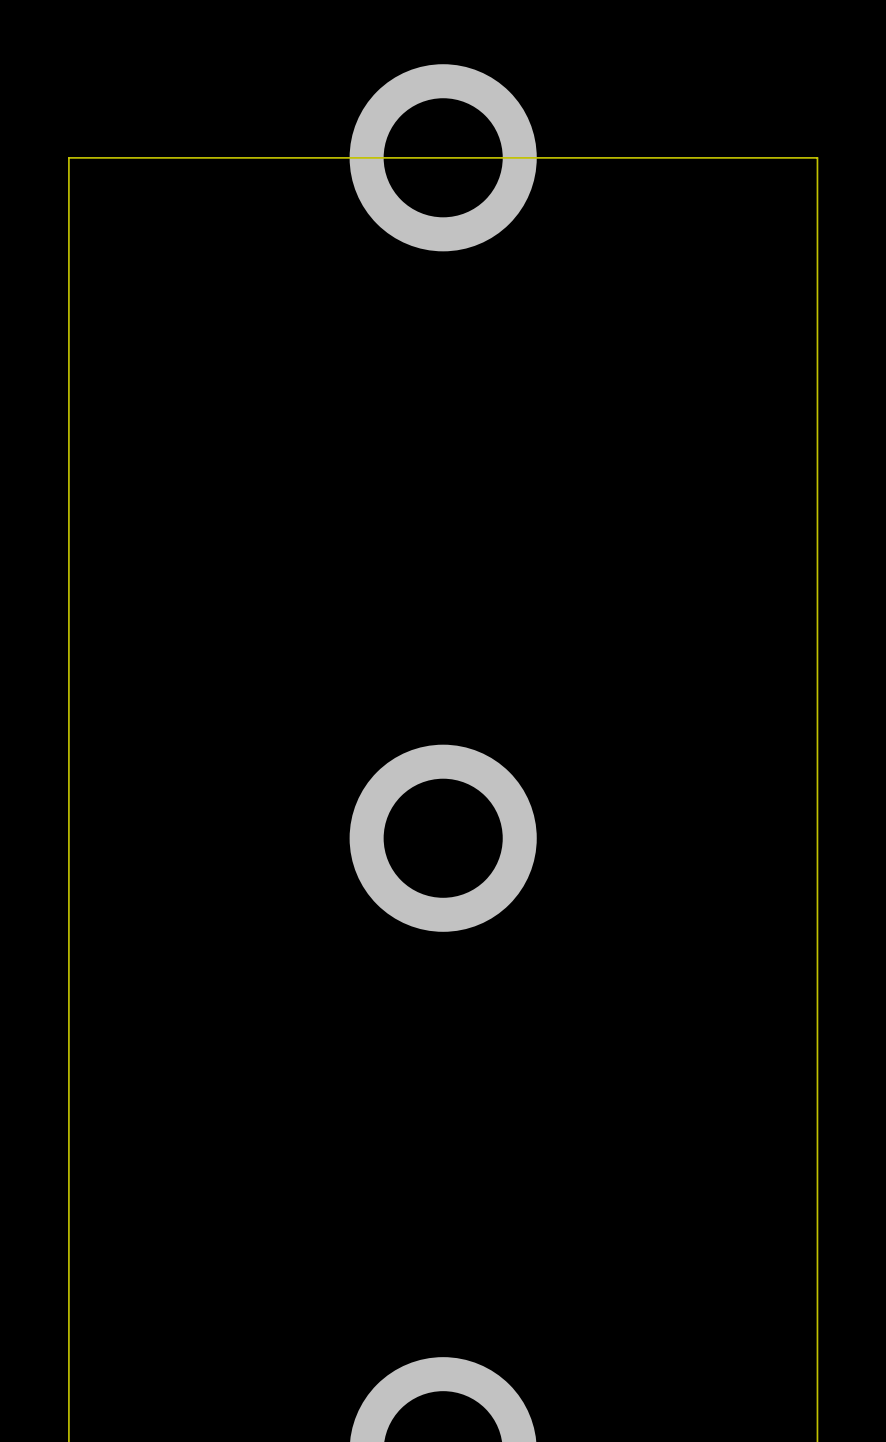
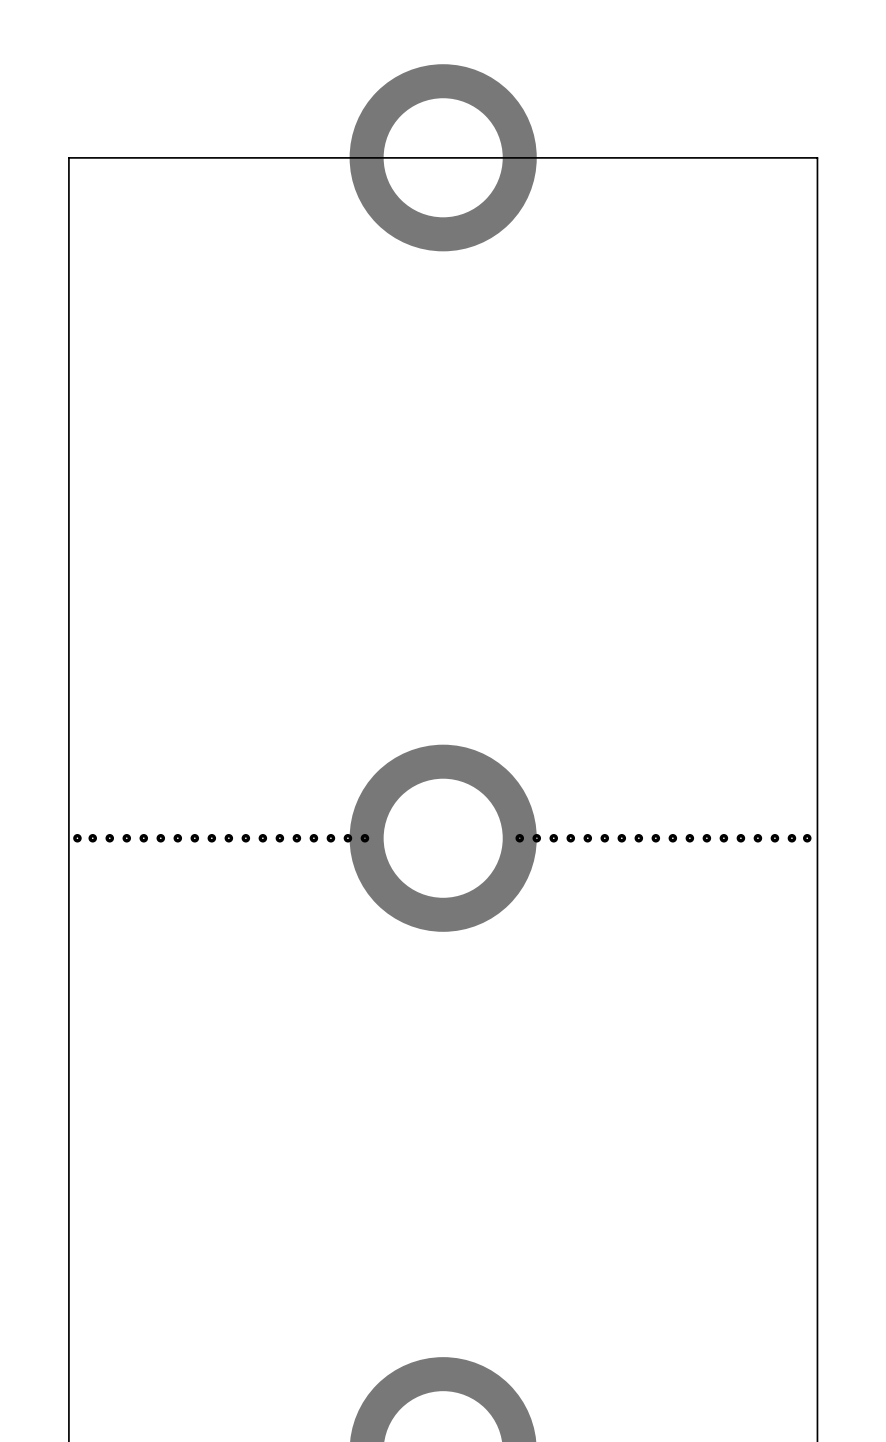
round board edge: none -> [73, 834, 82, 843]
round board edge: none -> [88, 834, 98, 843]
round board edge: none -> [105, 834, 115, 843]
round board edge: none -> [122, 834, 132, 843]
round board edge: none -> [139, 834, 149, 843]
round board edge: none -> [156, 834, 166, 843]
round board edge: none -> [173, 834, 183, 843]
round board edge: none -> [190, 834, 200, 843]
round board edge: none -> [207, 834, 217, 843]
round board edge: none -> [224, 834, 234, 843]
round board edge: none -> [241, 834, 251, 843]
round board edge: none -> [258, 834, 268, 843]
round board edge: none -> [275, 834, 285, 843]
round board edge: none -> [292, 834, 302, 843]
round board edge: none -> [309, 834, 319, 843]
round board edge: none -> [326, 834, 336, 843]
round board edge: none -> [343, 834, 353, 843]
round board edge: none -> [360, 834, 370, 843]
round board edge: none -> [515, 834, 525, 843]
round board edge: none -> [532, 834, 542, 843]
round board edge: none -> [549, 834, 559, 843]
round board edge: none -> [566, 834, 576, 843]
round board edge: none -> [583, 834, 593, 843]
round board edge: none -> [600, 834, 610, 843]
round board edge: none -> [617, 834, 627, 843]
round board edge: none -> [634, 834, 644, 843]
round board edge: none -> [651, 834, 661, 843]
round board edge: none -> [668, 834, 678, 843]
round board edge: none -> [685, 834, 695, 843]
round board edge: none -> [702, 834, 712, 843]
round board edge: none -> [719, 834, 729, 843]
round board edge: none -> [736, 834, 746, 843]
round board edge: none -> [753, 834, 763, 843]
round board edge: none -> [770, 834, 780, 843]
round board edge: none -> [787, 834, 797, 843]
round board edge: none -> [802, 834, 812, 843]

